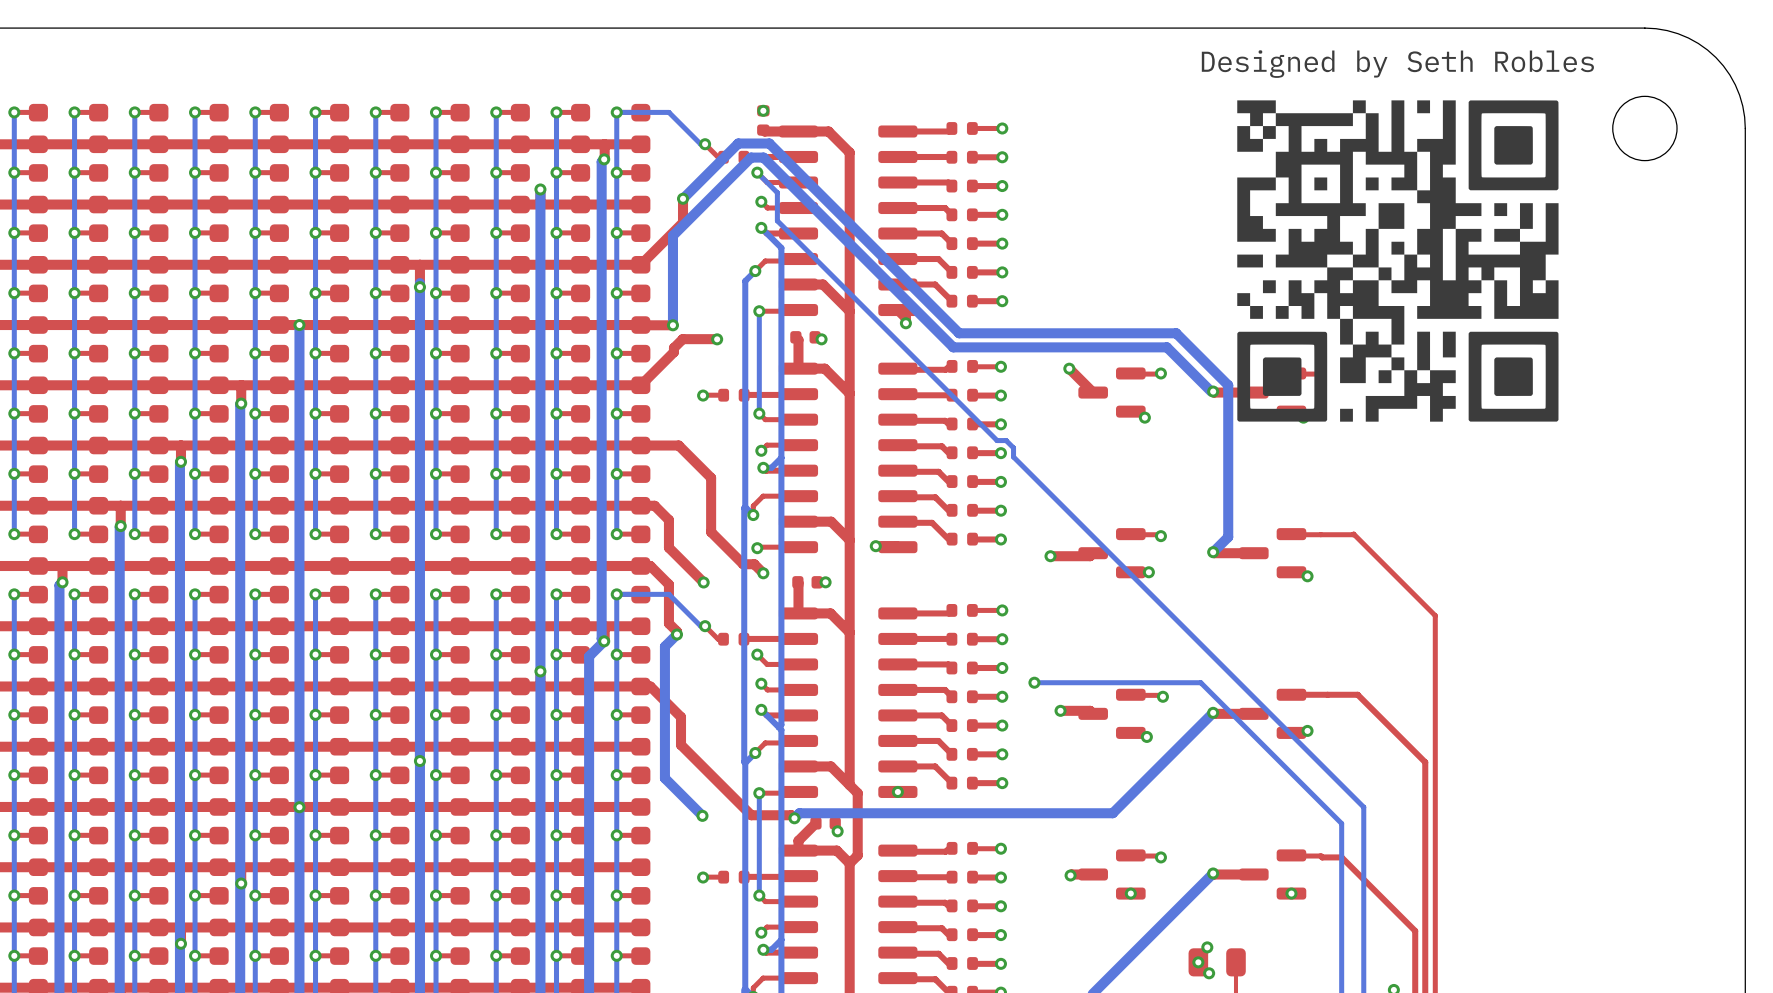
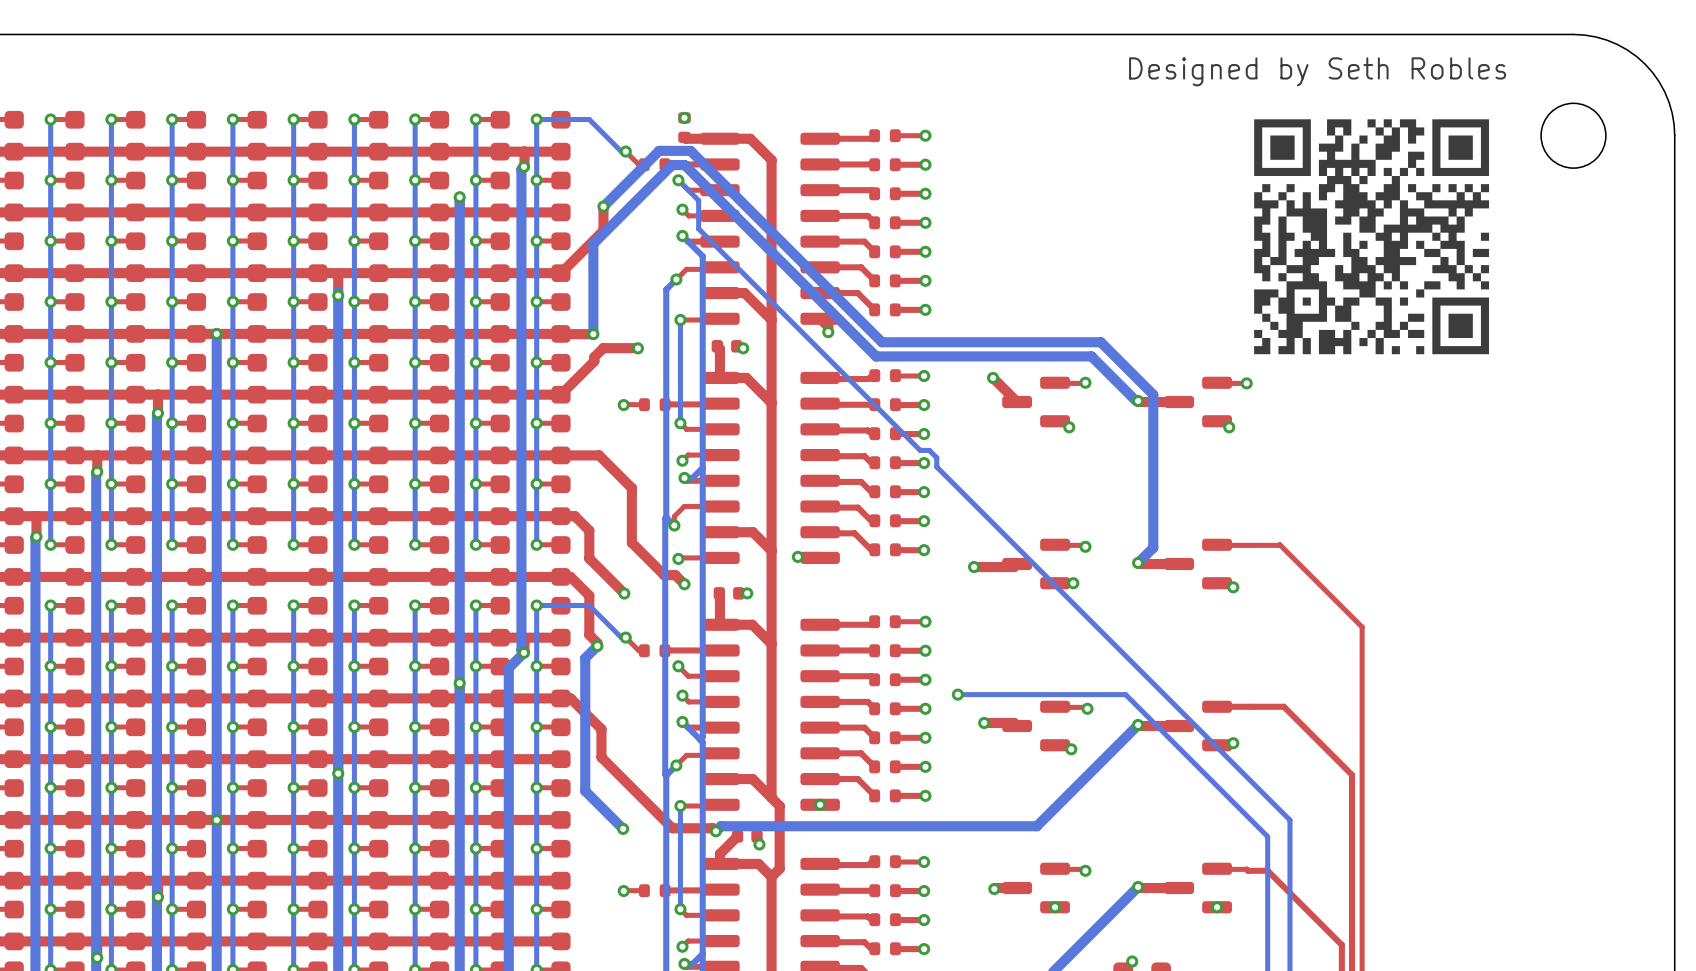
drawing: [1237, 100, 1559, 422] -> none
drawing: none -> [1254, 119, 1490, 355]

